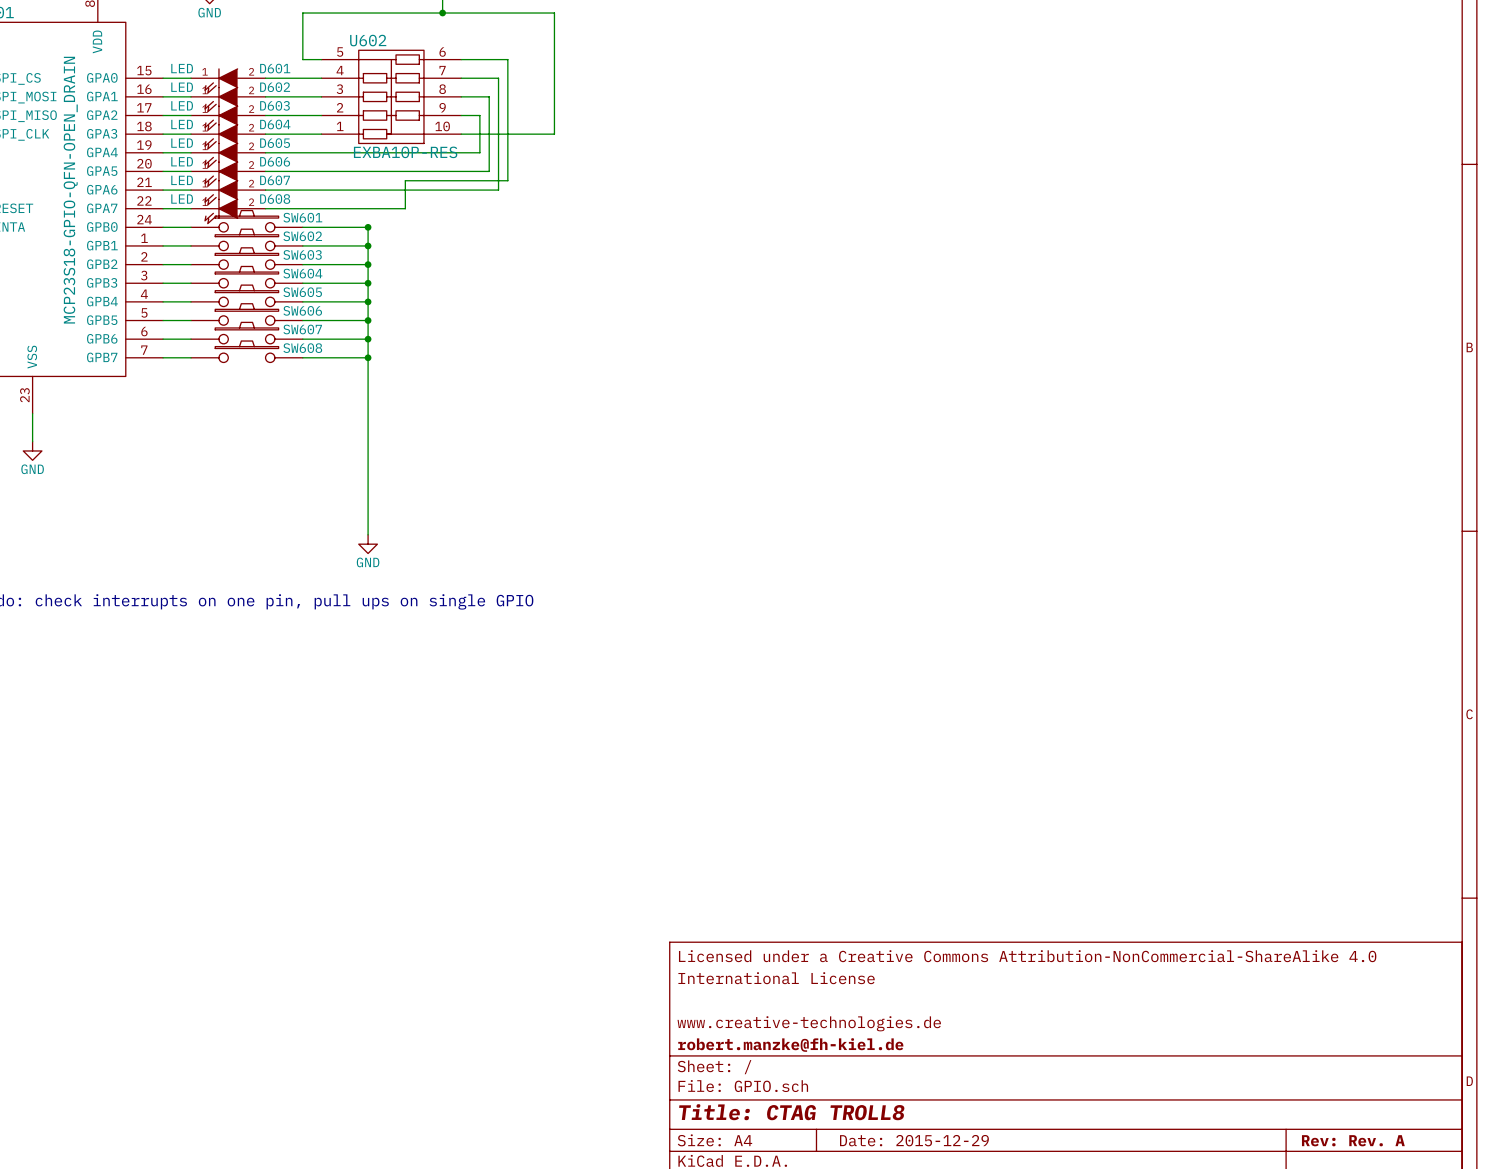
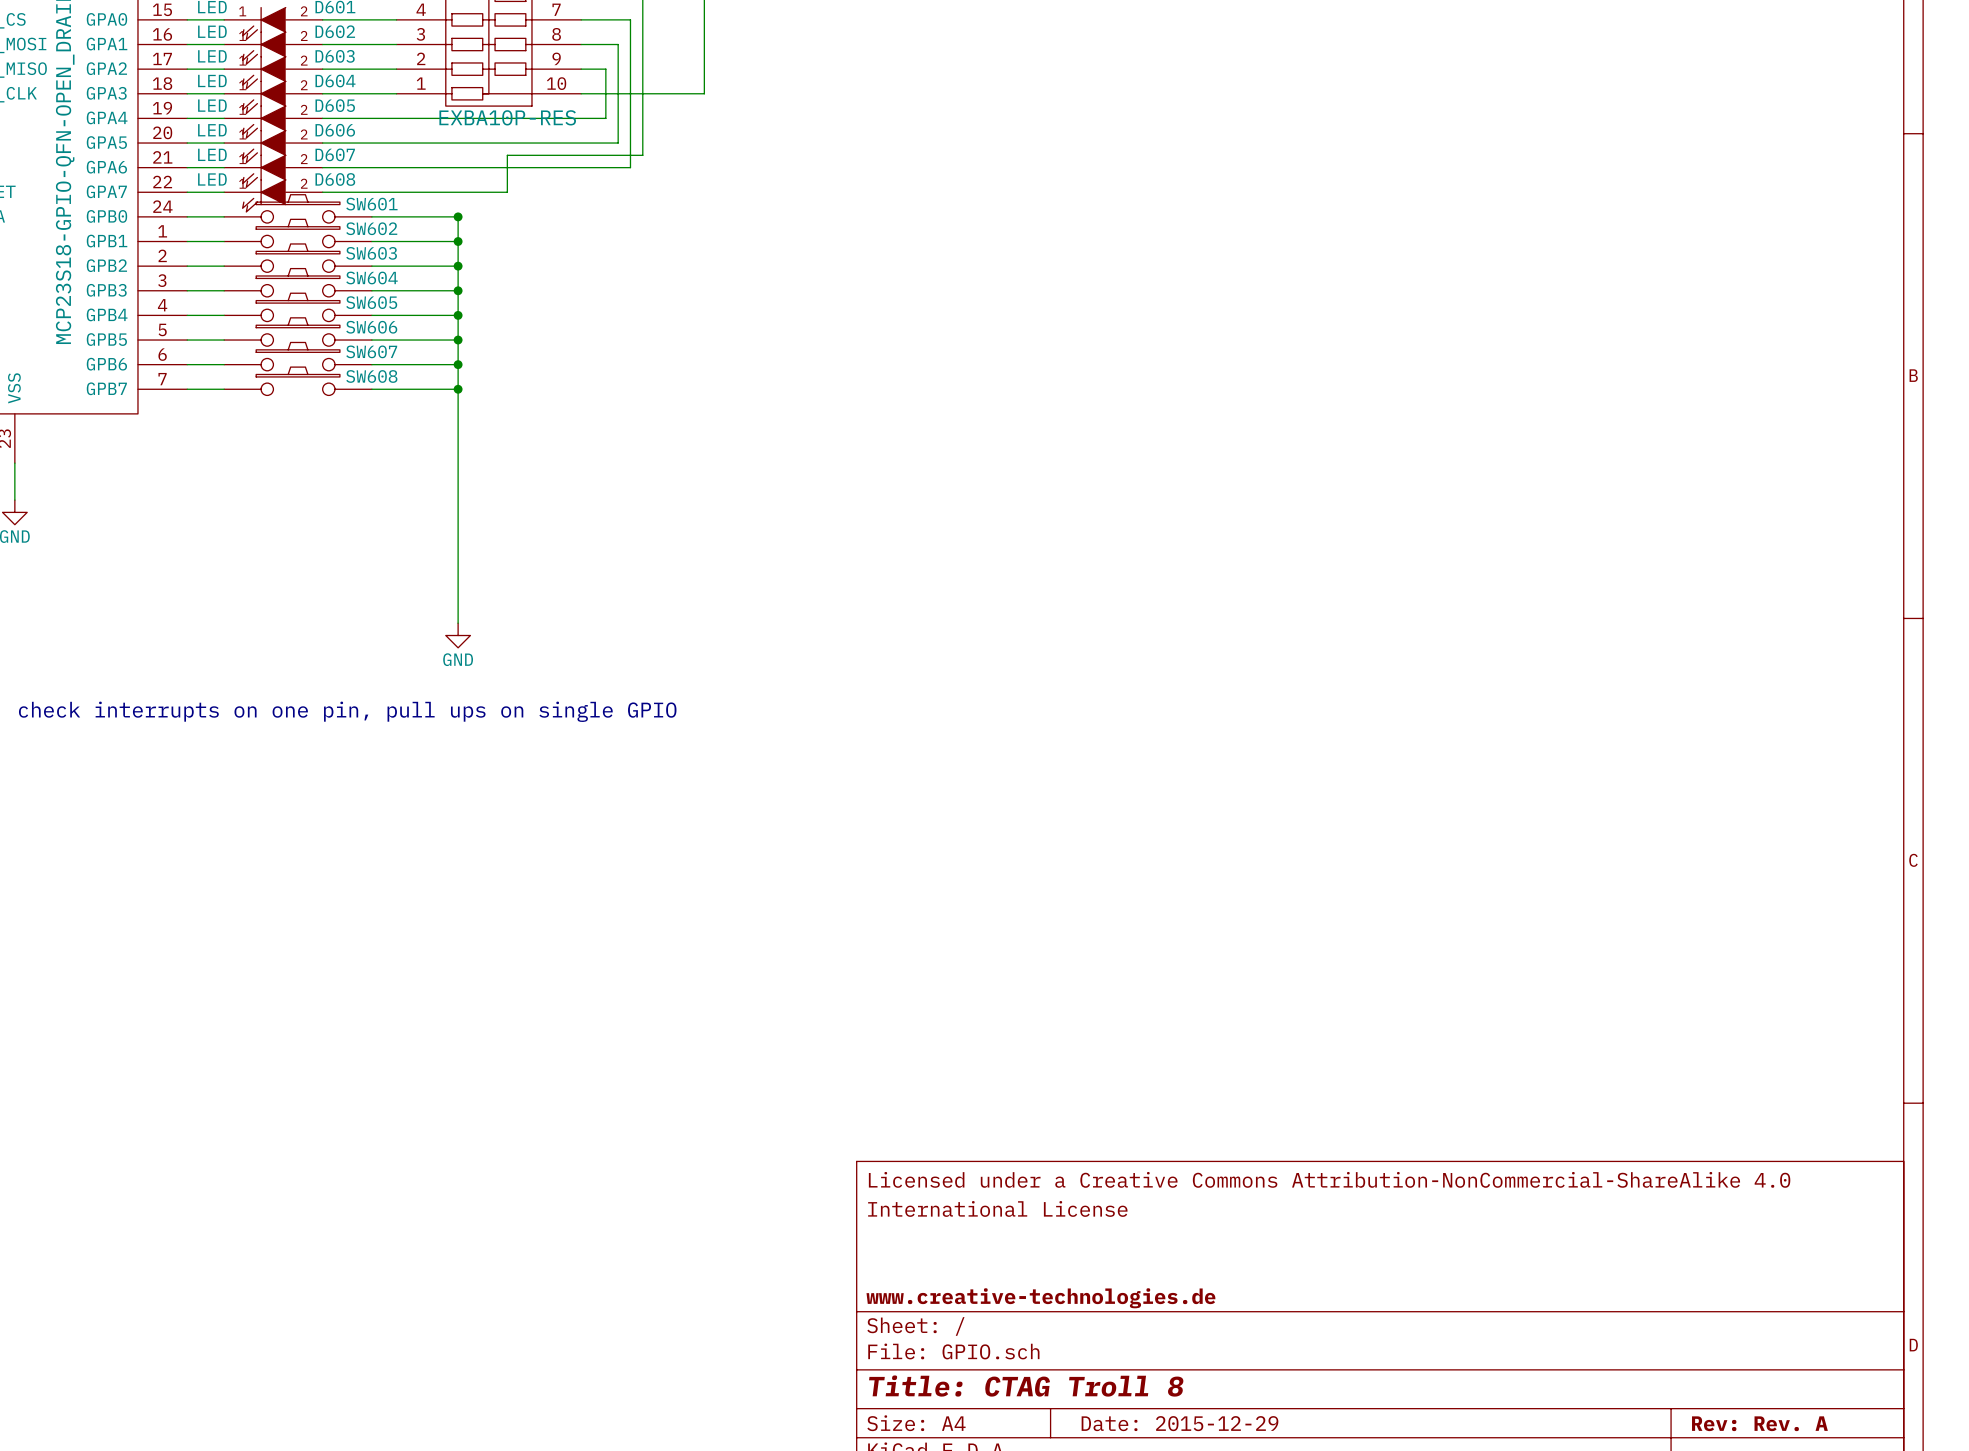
title block: www.creative-technologies.de (809, 1023) -> none
title block: robert.manzke@fh-kiel.de (790, 1045) -> www.creative-technologies.de (1040, 1298)
title block: Title: CTAG TROLL8 (791, 1112) -> Title: CTAG Troll 8 (1026, 1386)

